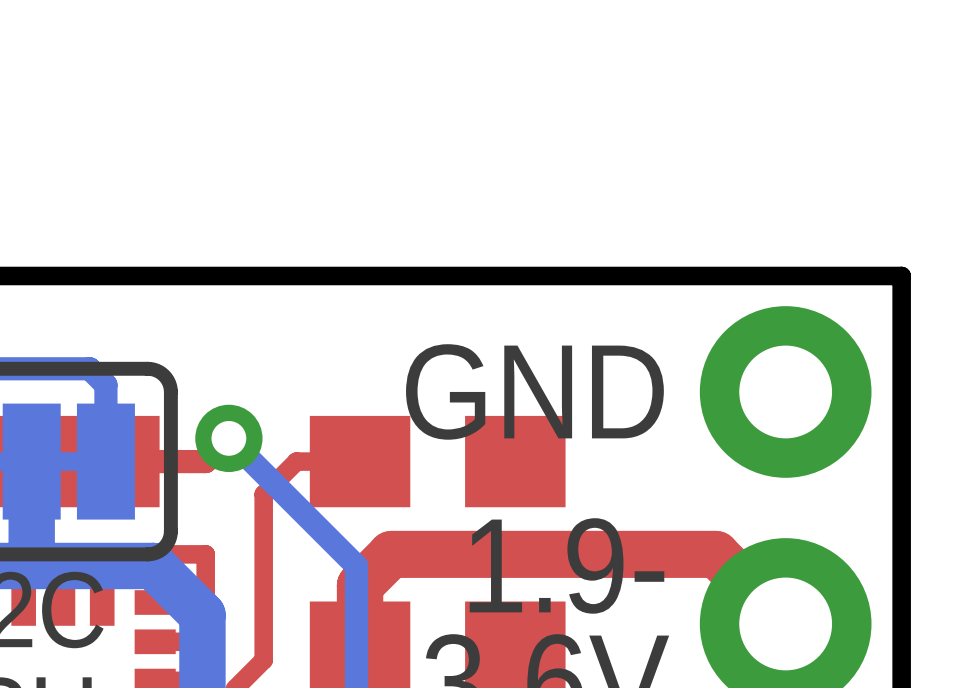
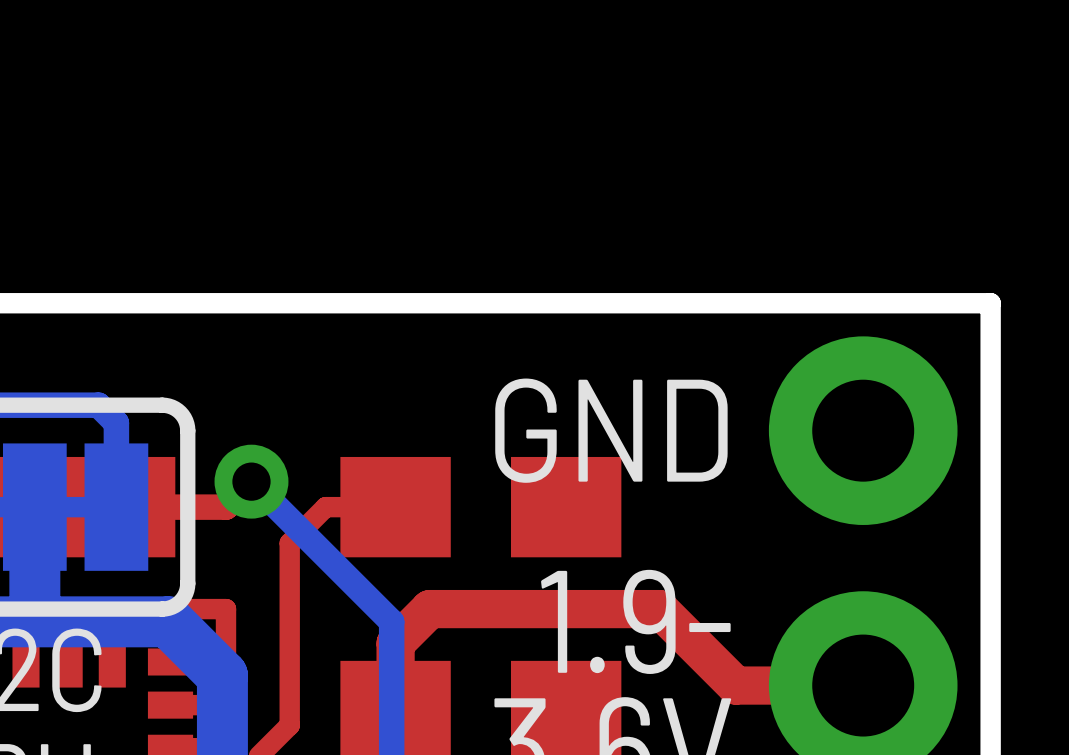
top track: (600, 554) (716, 554) (785, 623) -> (659, 609) (735, 685) (863, 685)
top track width: thick (600, 554) (391, 554) (360, 585) (360, 647) -> thin (659, 609) (429, 609) (395, 643) (395, 711)

